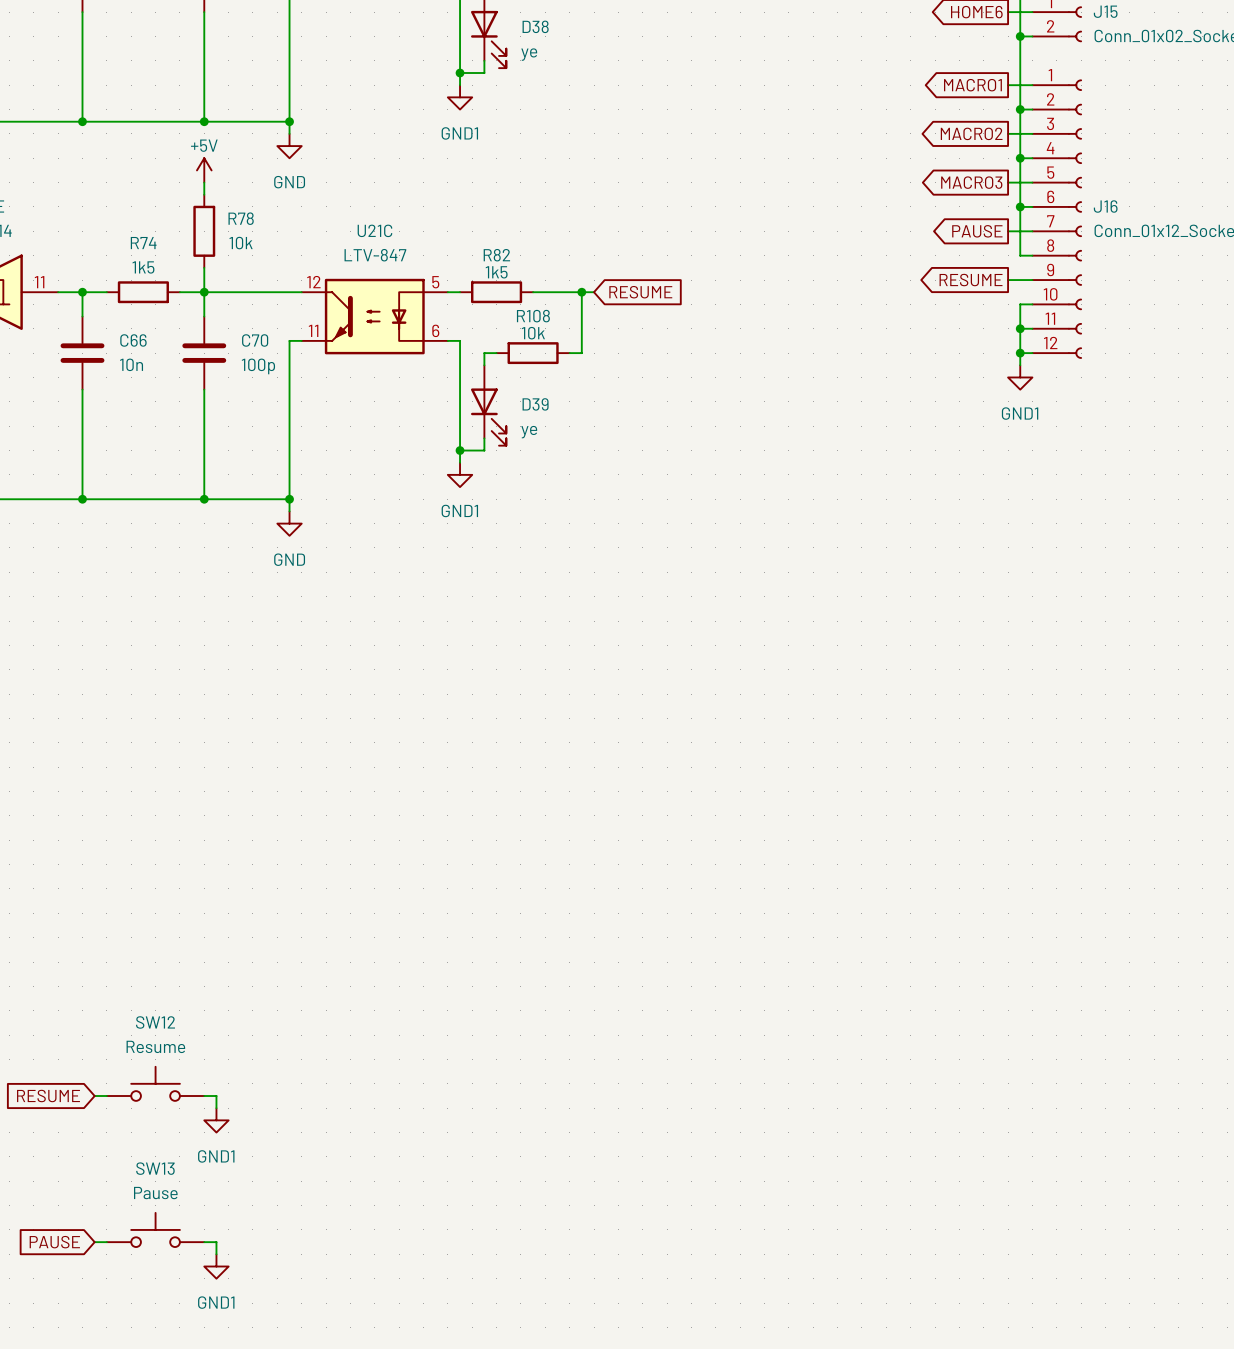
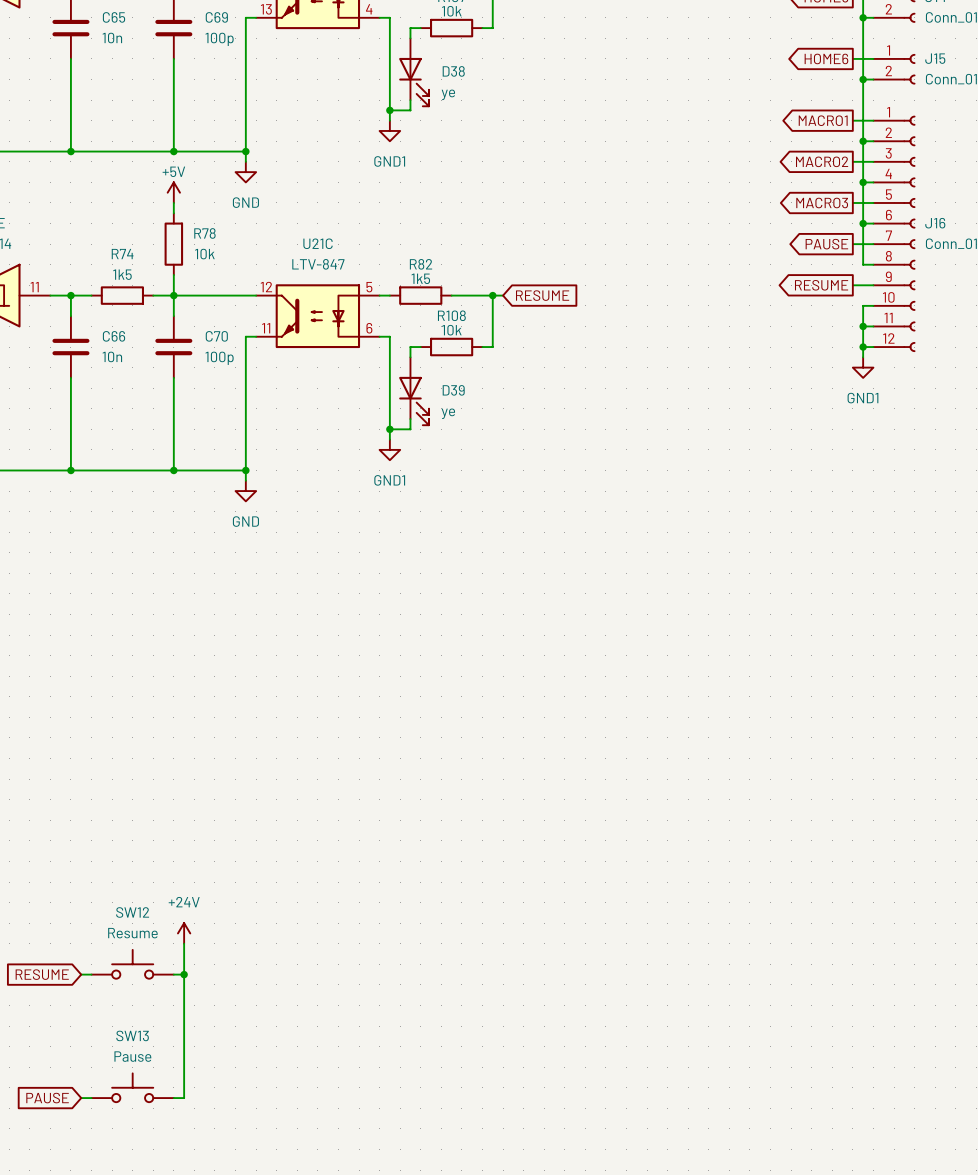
power symbol: none -> +24V (184, 933)
wire: none -> (184, 943) (184, 974)
junction: none -> (184, 974)
power symbol: GND1 (216, 1120) -> none
wire: (216, 1242) (216, 1254) -> (184, 1098) (184, 984)
power symbol: GND1 (216, 1266) -> none

